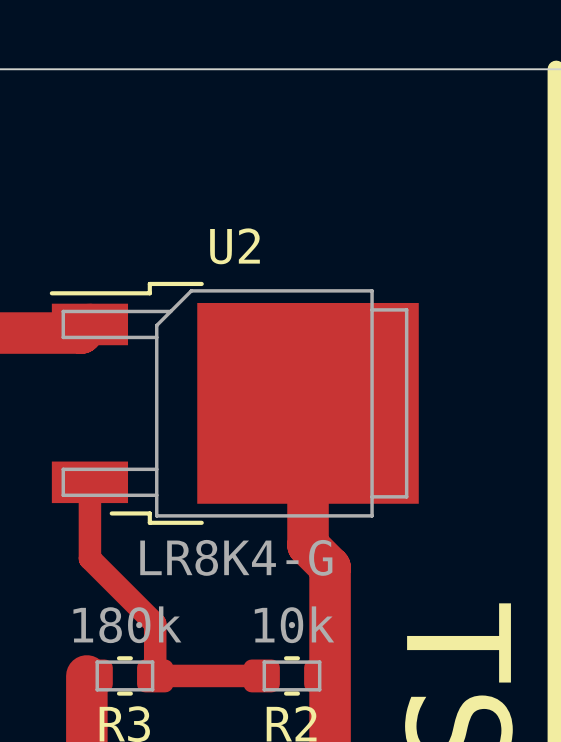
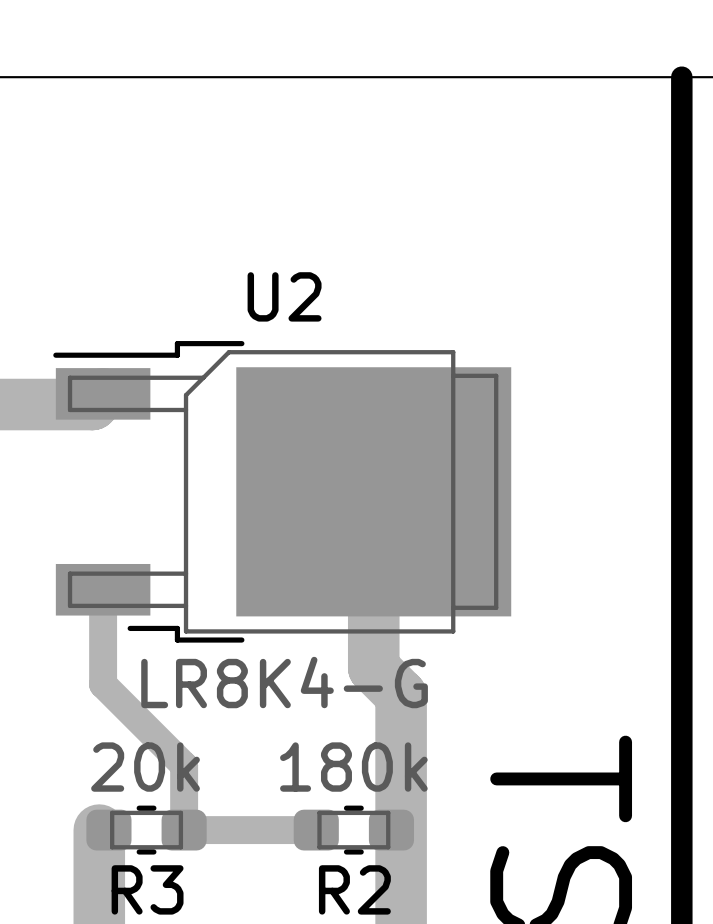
R3 value: 180k (127, 624) -> 20k (145, 767)
R2 value: 10k (294, 624) -> 180k (353, 767)

